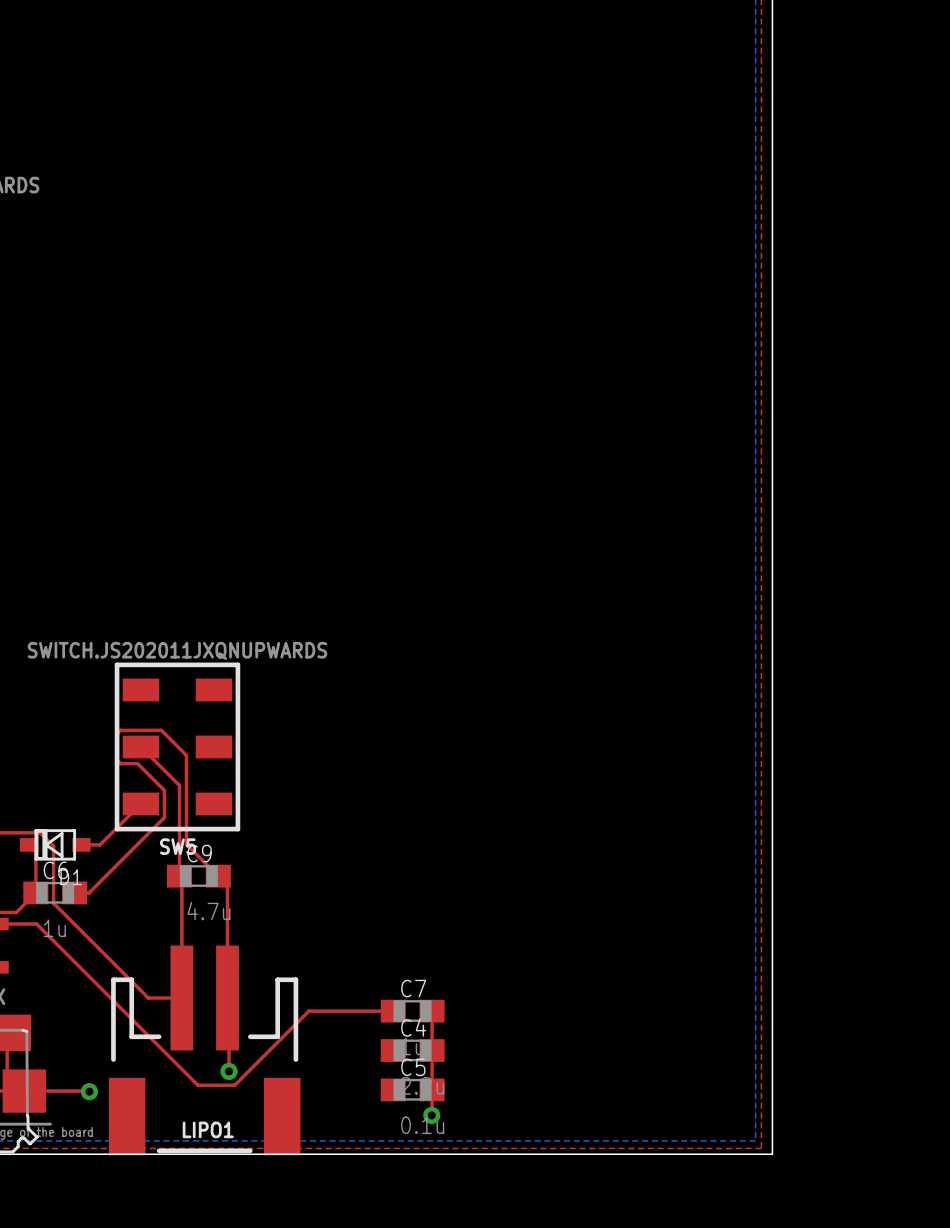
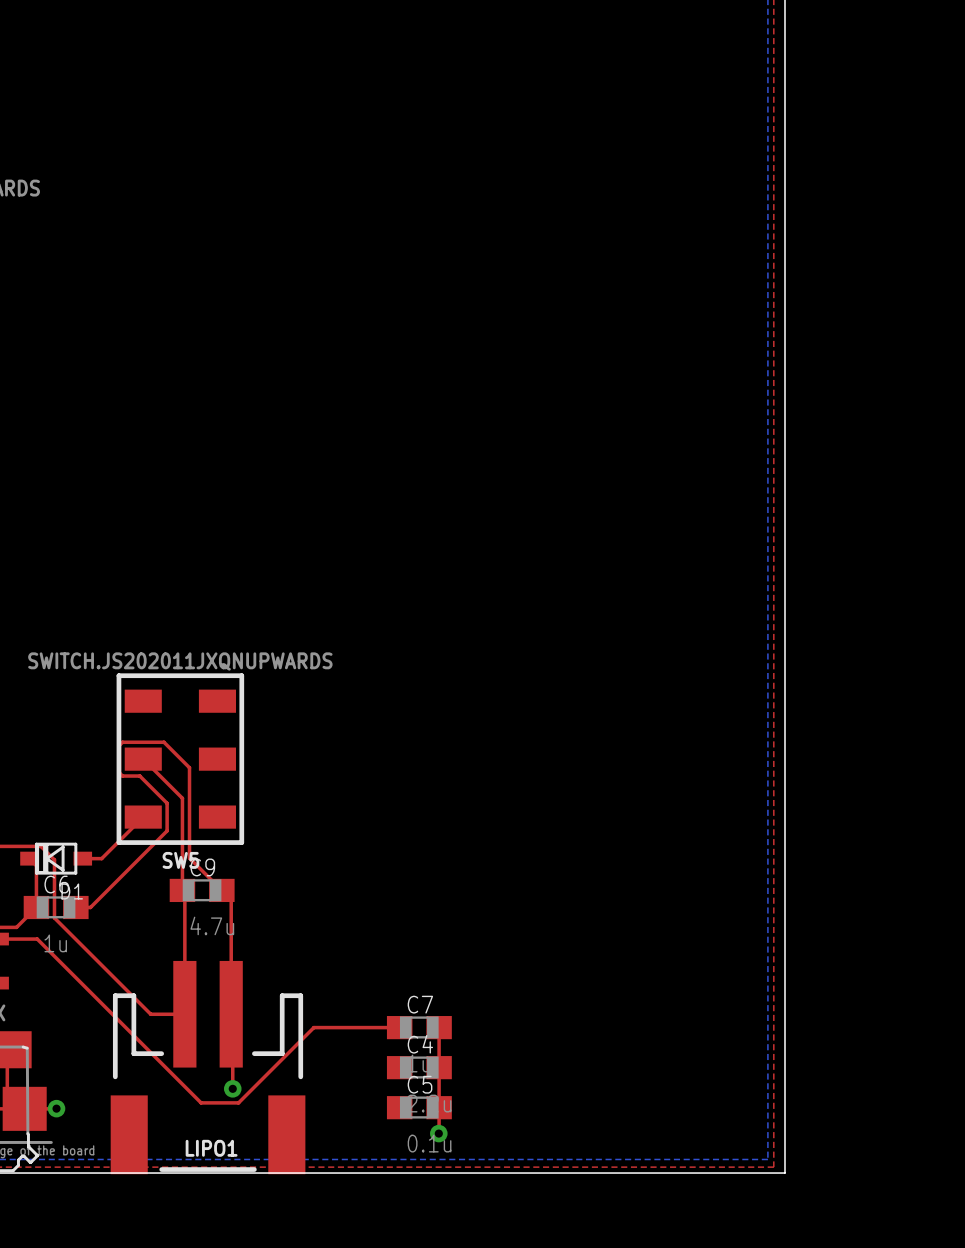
top track: (55, 1091) (89, 1091) -> none
via position: (89, 1091) -> (56, 1108)

